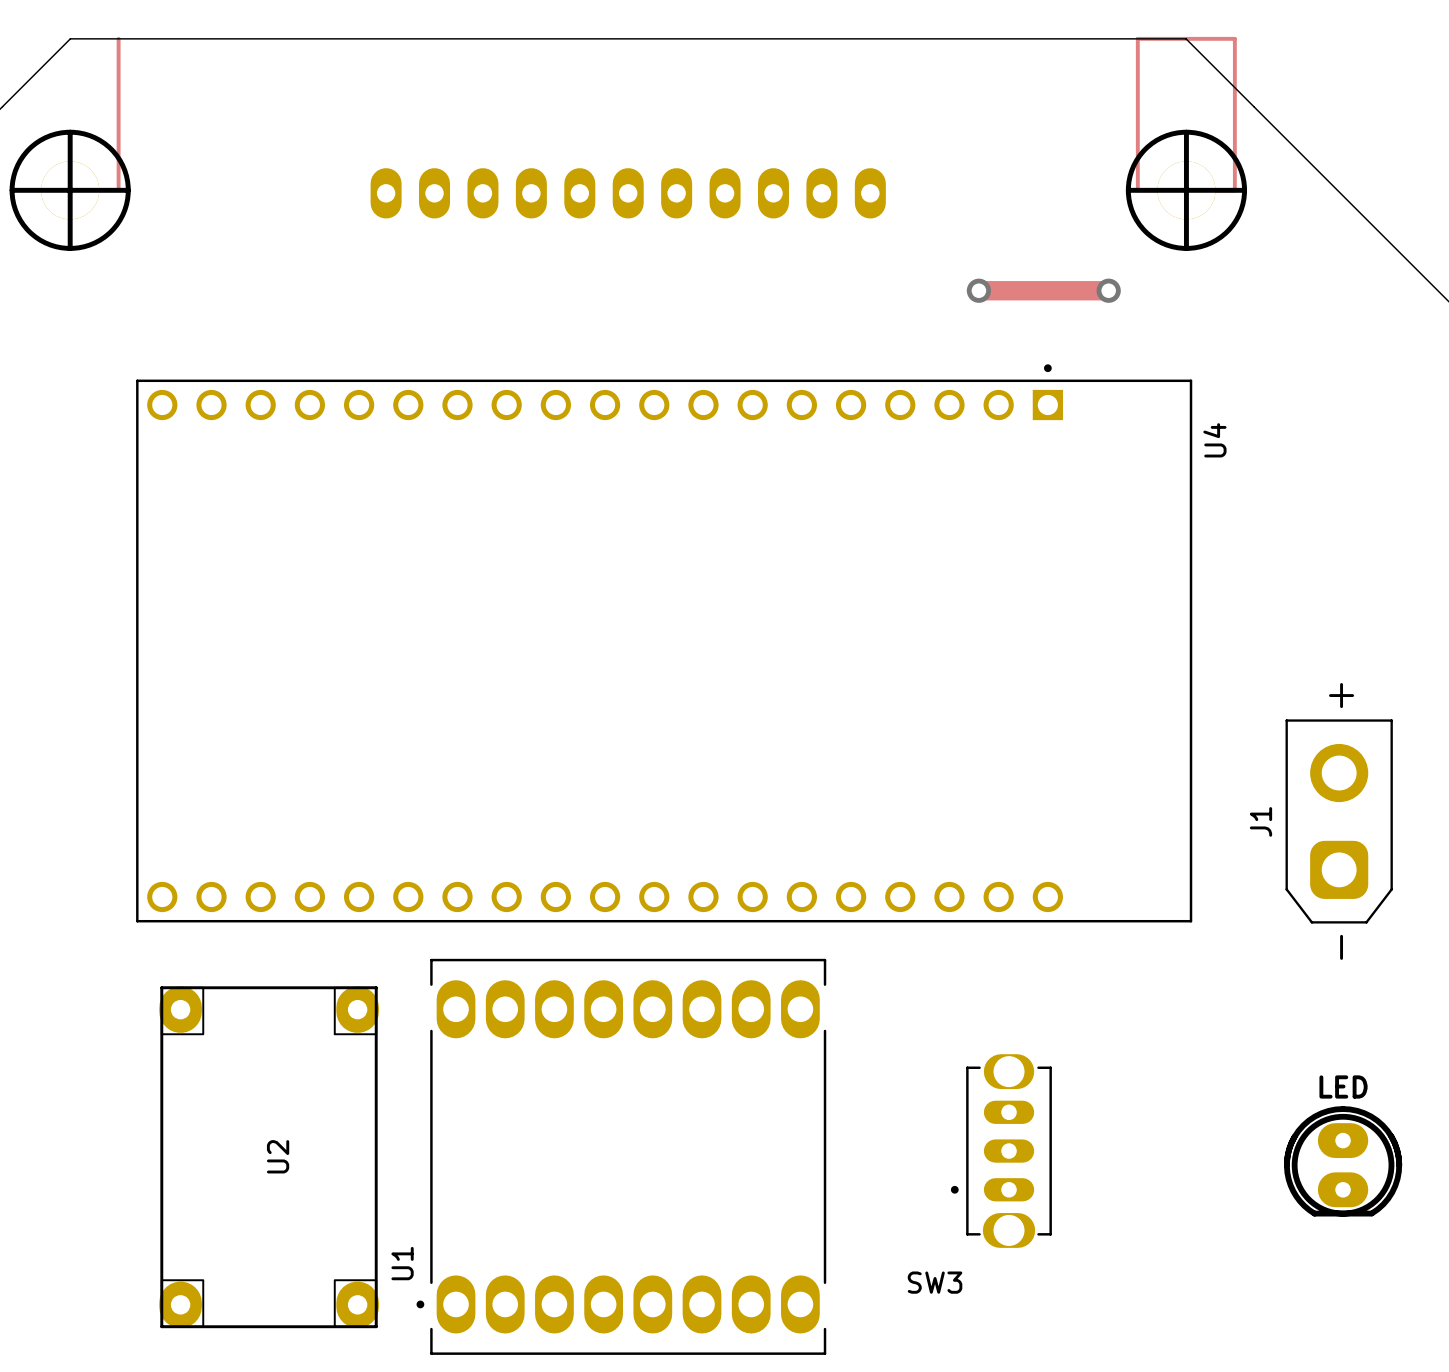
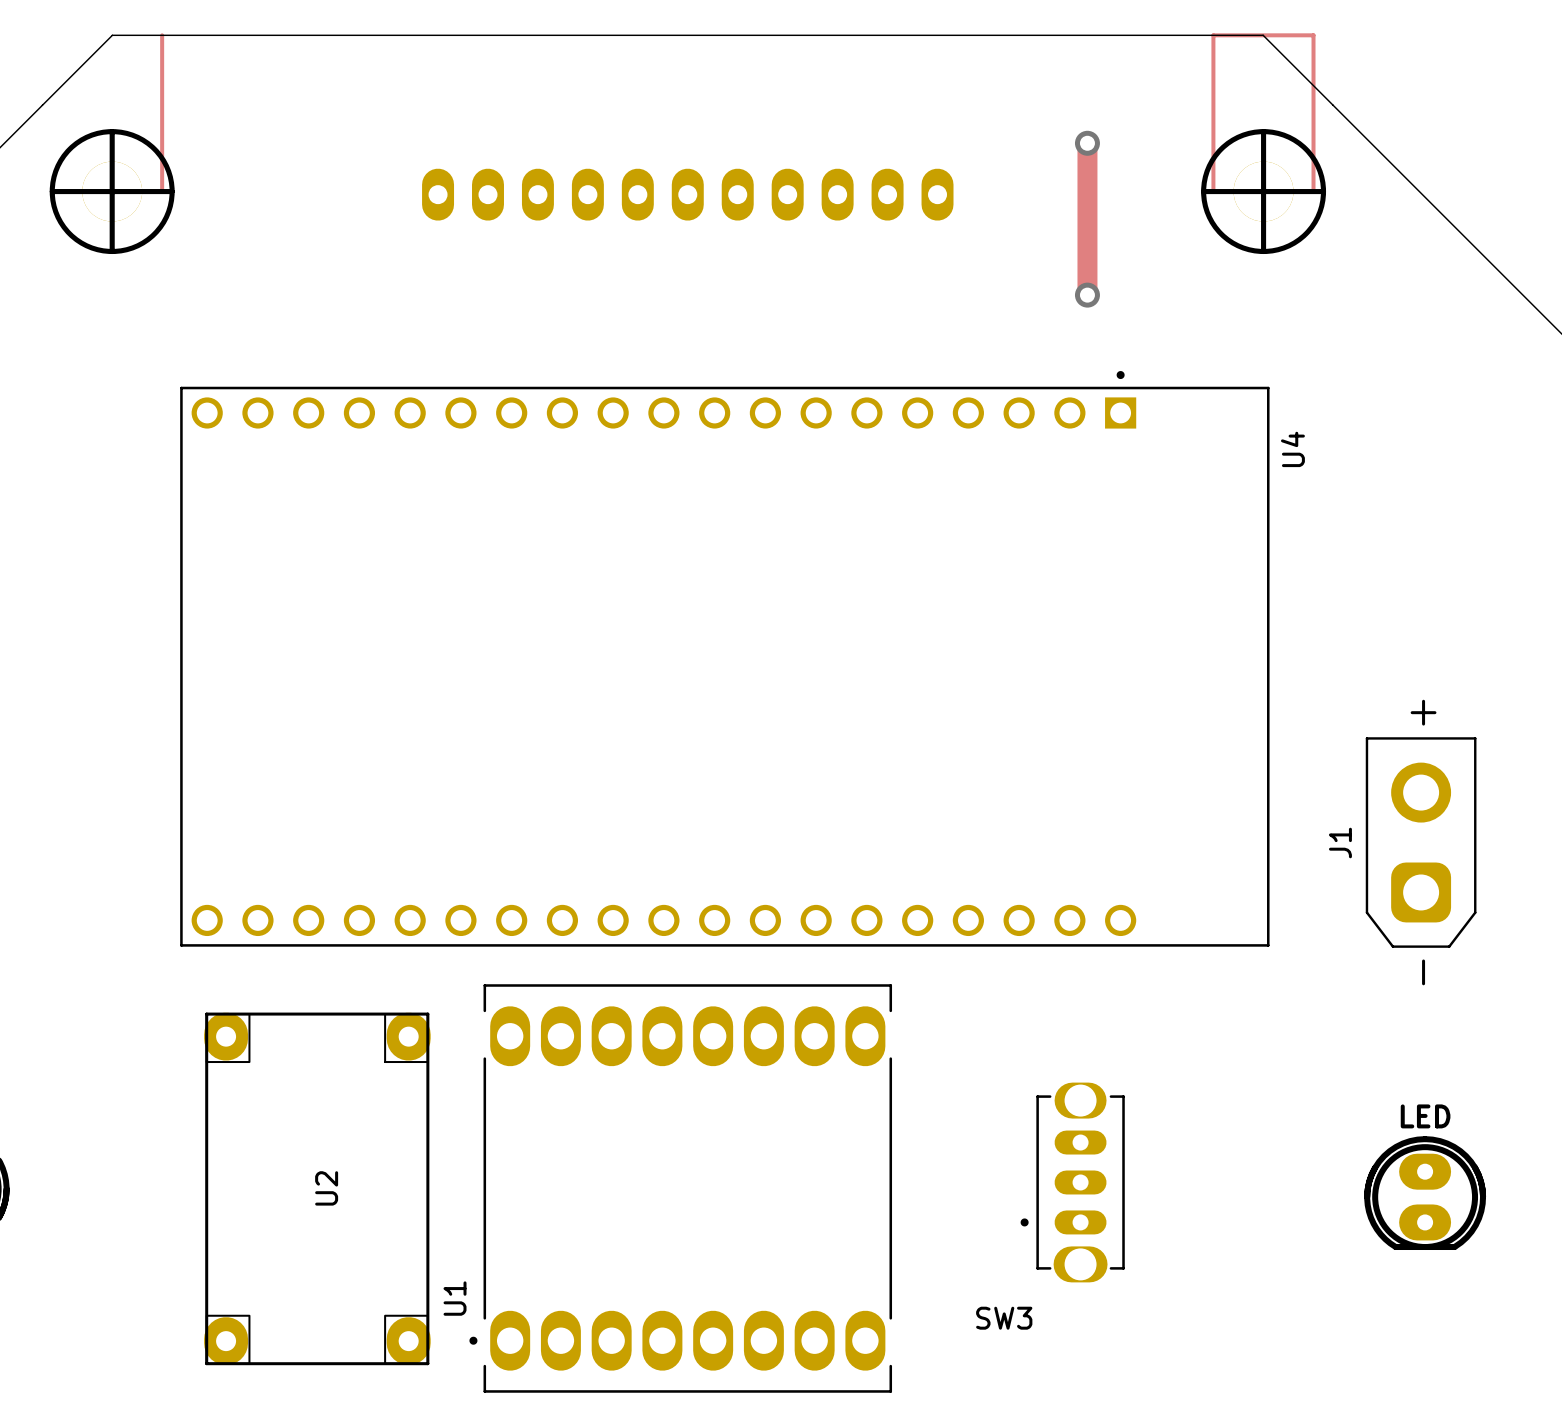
track: none -> (1087, 143) (1087, 295)
via: none -> (1087, 143)
track: (978, 290) (1108, 290) -> none
via position: (978, 290) -> (1087, 295)
via: (1108, 290) -> none

